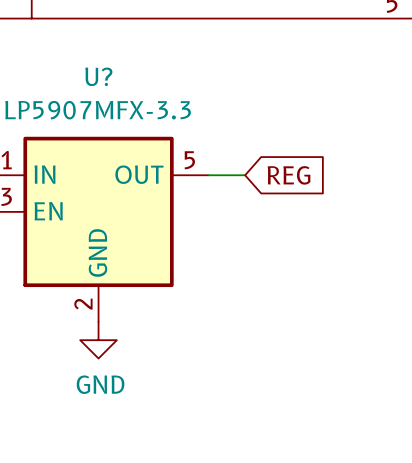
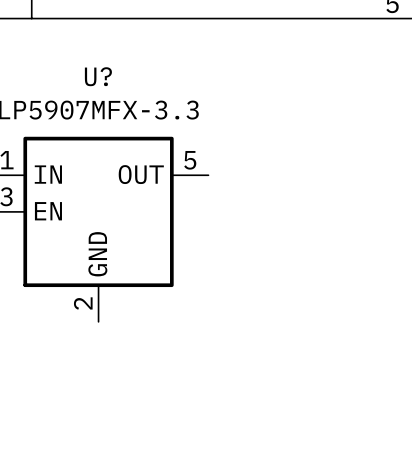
wire: (208, 175) (245, 175) -> none
global label: REG (288, 175) -> none
power symbol: GND (98, 340) -> none

